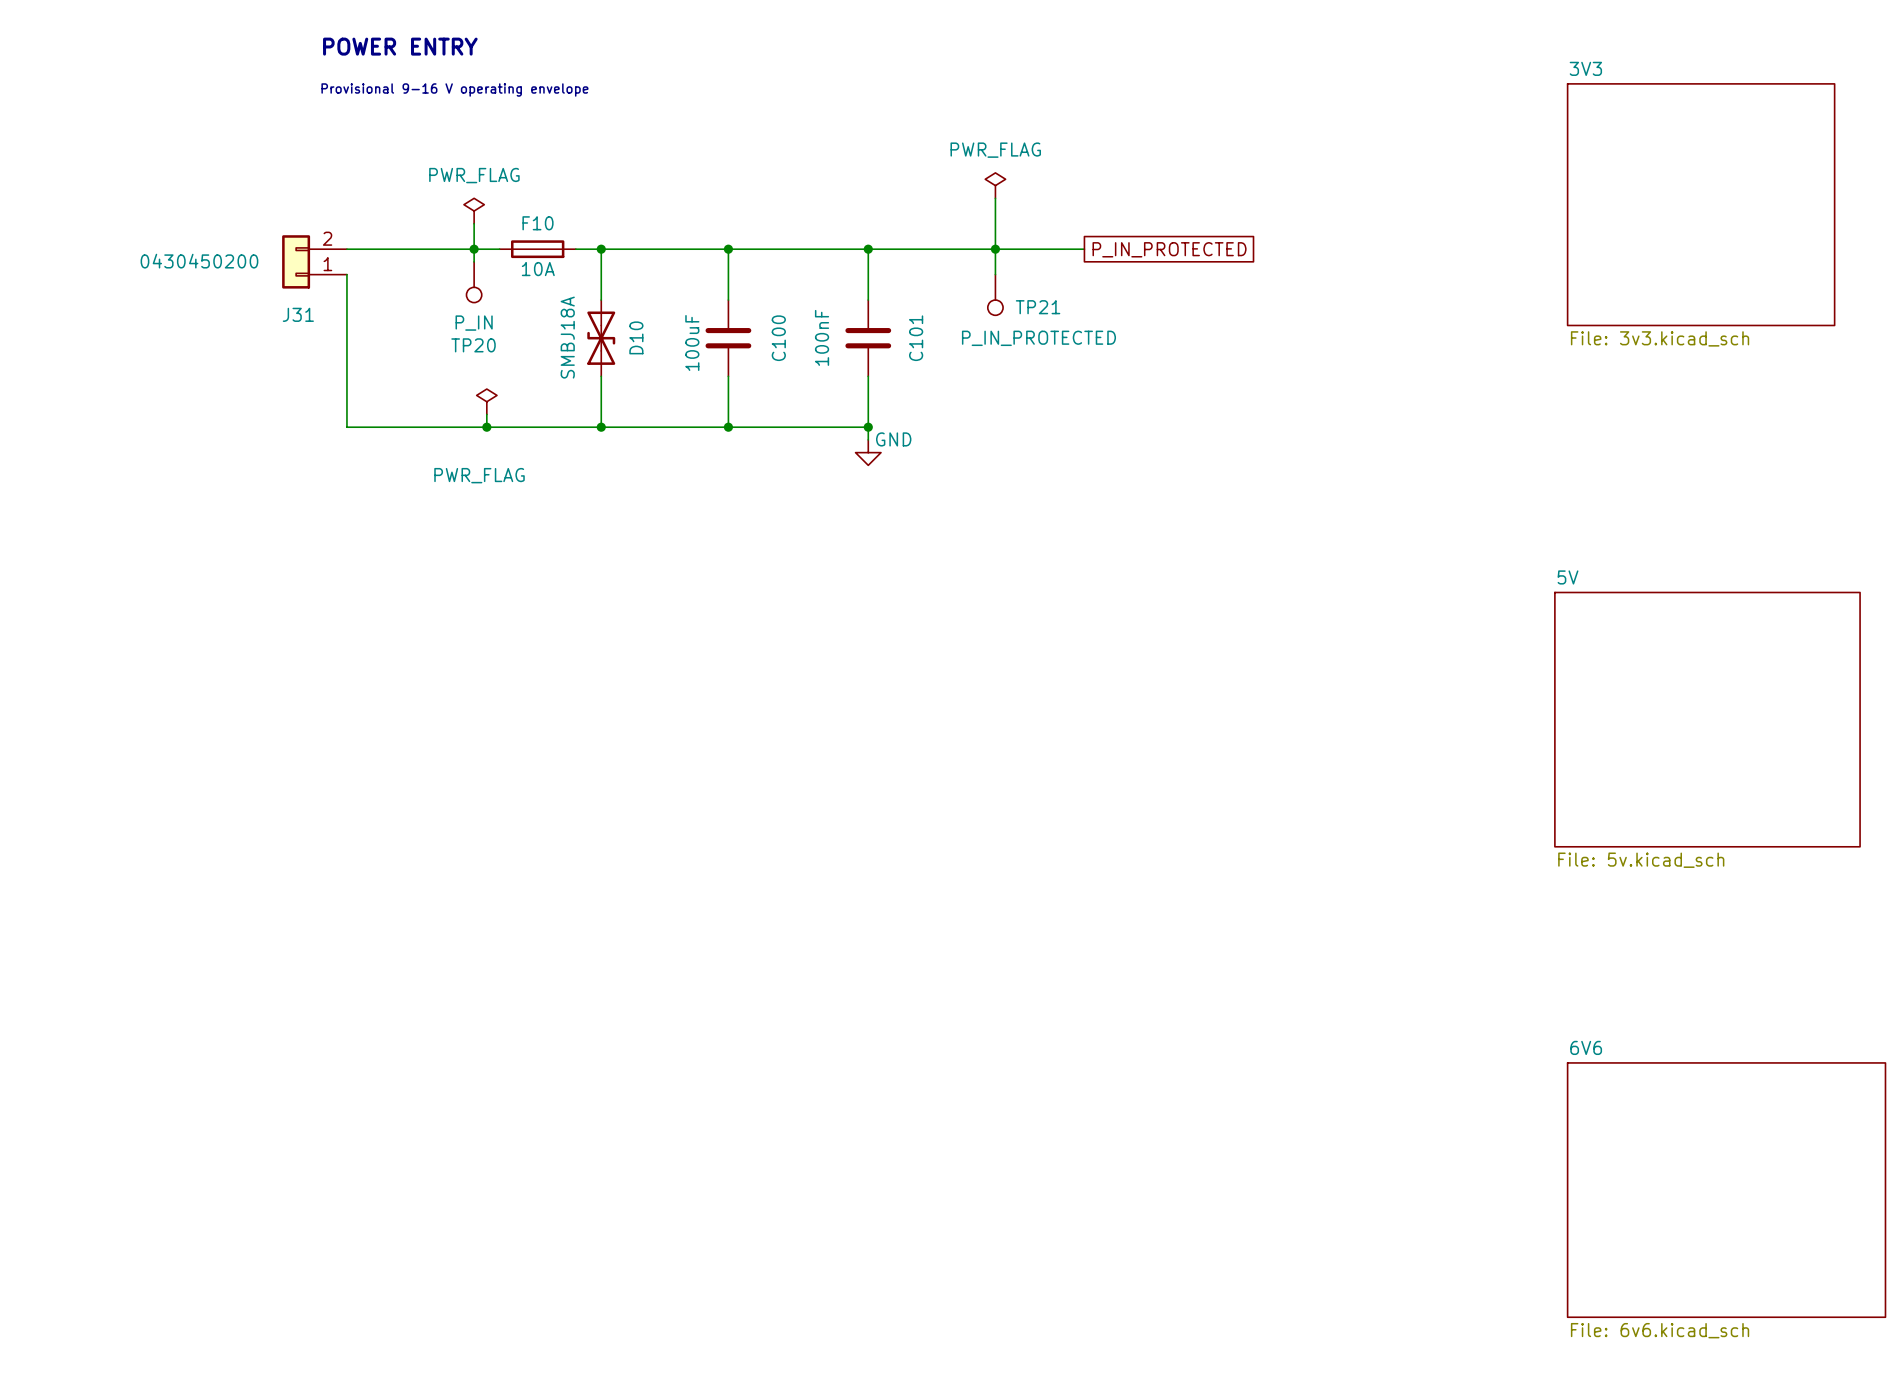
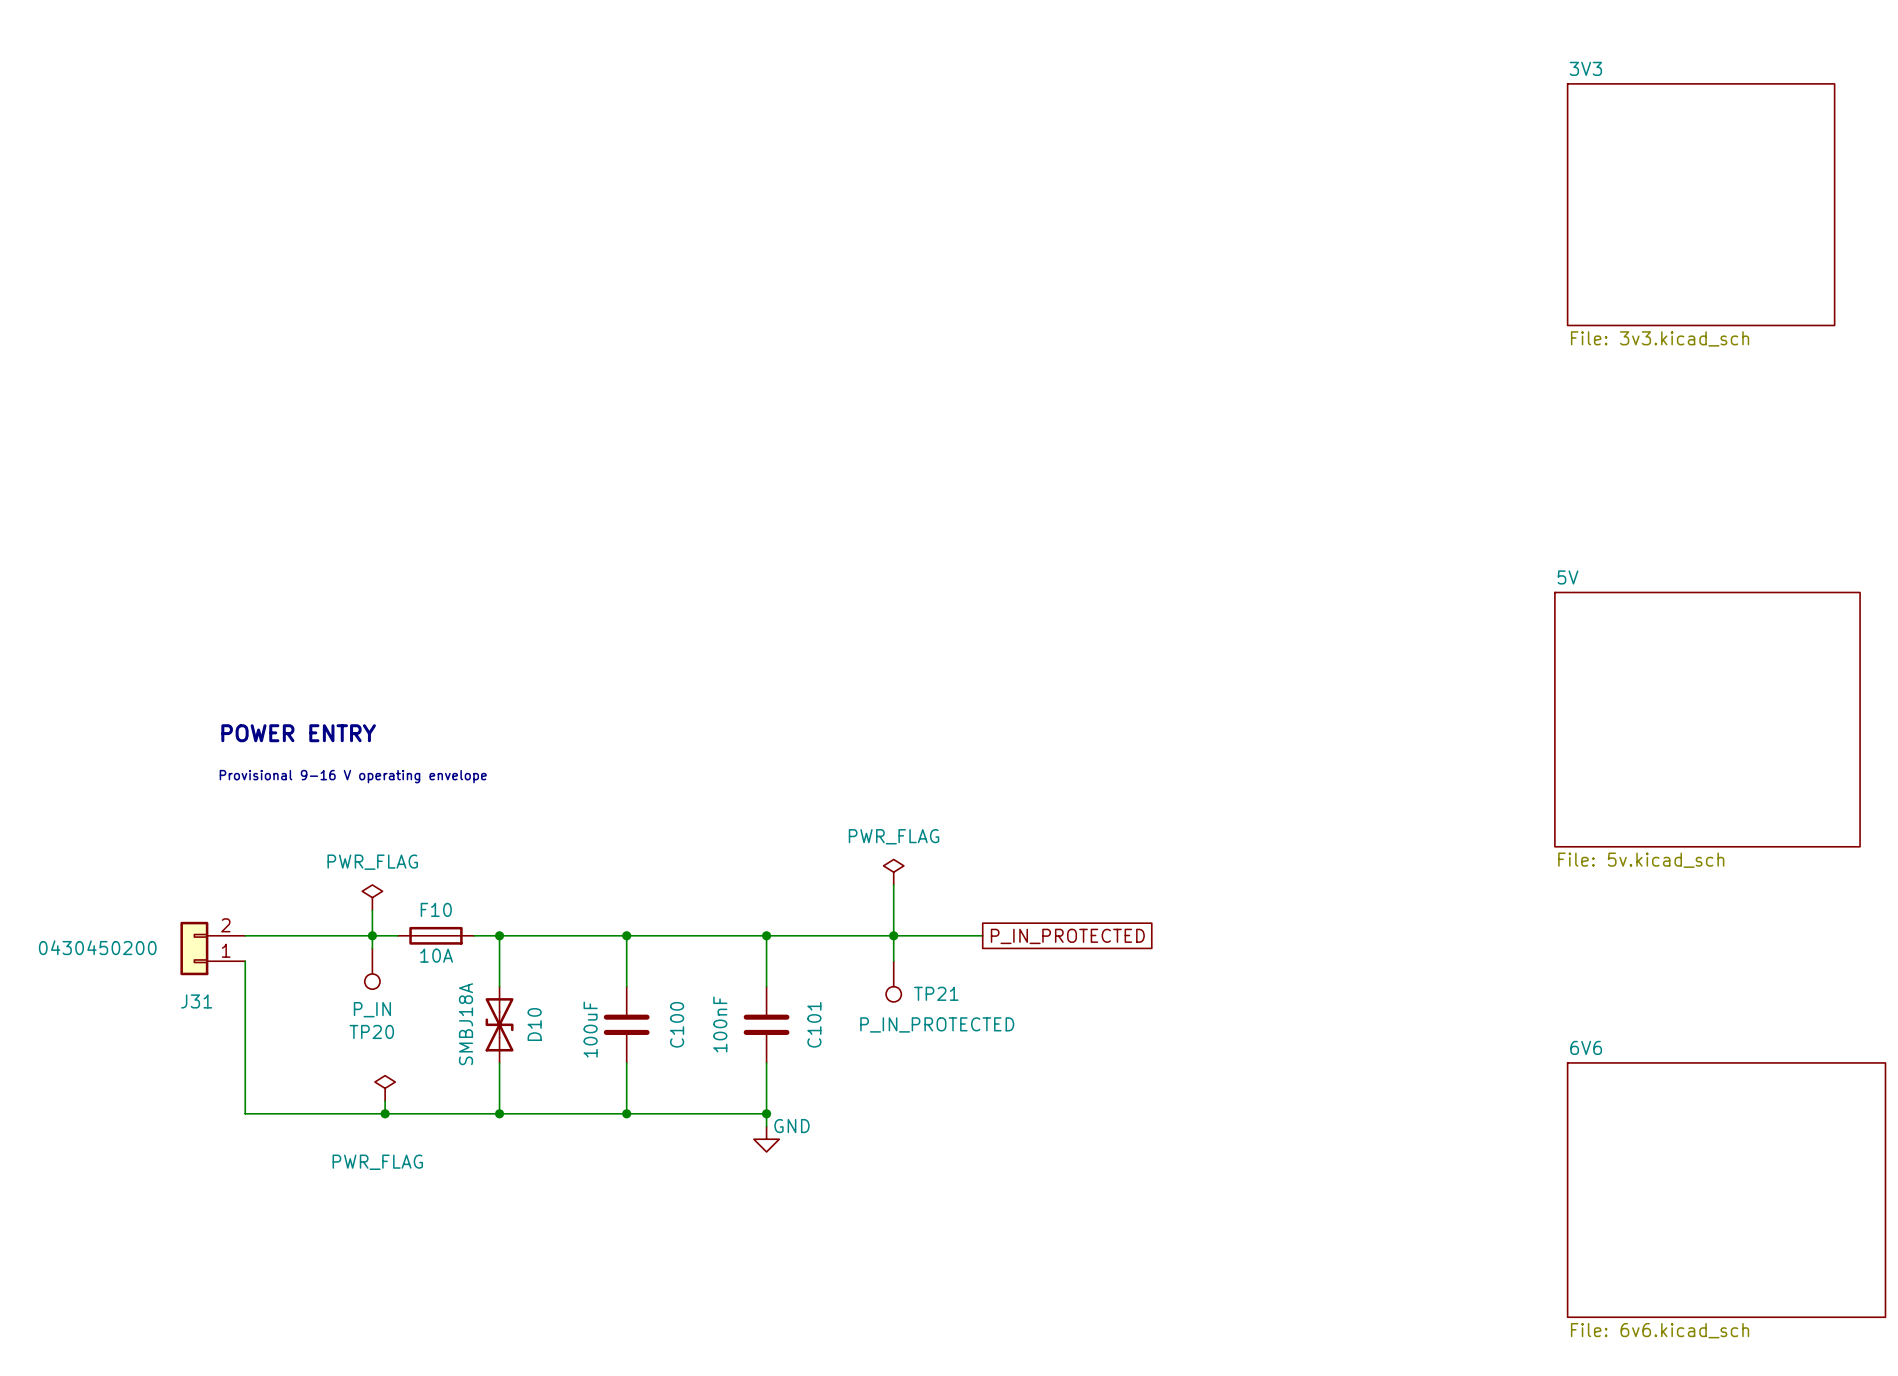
text: POWER ENTRY (400, 46) -> none
text: Provisional 9-16 V operating envelope (454, 90) -> none
power symbol: PWR_FLAG (995, 185) -> none
wire: (995, 198) (995, 274) -> none
power symbol: PWR_FLAG (474, 211) -> none
wire: (474, 223) (474, 261) -> none
wire: (346, 249) (499, 249) -> none
junction: (474, 249) -> none
F10 position: (537, 249) -> (435, 935)
wire: (575, 249) (1084, 249) -> none
wire: (601, 249) (601, 300) -> none
junction: (601, 249) -> none
wire: (728, 249) (728, 300) -> none
junction: (728, 249) -> none
wire: (868, 249) (868, 300) -> none
junction: (868, 249) -> none
junction: (995, 249) -> none
global label: P_IN_PROTECTED (1169, 249) -> none
J31 position: (314, 261) -> (212, 948)
wire: (346, 274) (346, 427) (868, 427) -> none
TP20 position: (474, 282) -> (372, 968)
TP21 position: (995, 294) -> (893, 981)
D10 position: (601, 338) -> (499, 1024)
C100 position: (728, 338) -> (626, 1024)
C101 position: (868, 338) -> (766, 1024)
wire: (601, 376) (601, 427) -> none
wire: (728, 376) (728, 427) -> none
wire: (868, 376) (868, 439) -> none
power symbol: PWR_FLAG (486, 401) -> none
wire: (486, 414) (486, 427) -> none
junction: (486, 427) -> none
junction: (601, 427) -> none
junction: (728, 427) -> none
junction: (868, 427) -> none
power symbol: GND (868, 452) -> none
text: none -> POWER ENTRY (298, 733)
text: none -> Provisional 9-16 V operating envelope (353, 776)
power symbol: none -> PWR_FLAG (893, 872)
wire: none -> (893, 884) (893, 961)
power symbol: none -> PWR_FLAG (372, 897)
wire: none -> (372, 910) (372, 948)
wire: none -> (245, 935) (397, 935)
junction: none -> (372, 935)
wire: none -> (474, 935) (982, 935)
wire: none -> (499, 935) (499, 986)
junction: none -> (499, 935)
wire: none -> (626, 935) (626, 986)
junction: none -> (626, 935)
wire: none -> (766, 935) (766, 986)
junction: none -> (766, 935)
junction: none -> (893, 935)
global label: none -> P_IN_PROTECTED (1067, 936)
wire: none -> (245, 961) (245, 1113) (766, 1113)
wire: none -> (499, 1062) (499, 1113)
wire: none -> (626, 1062) (626, 1113)
wire: none -> (766, 1062) (766, 1126)
power symbol: none -> PWR_FLAG (385, 1088)
wire: none -> (385, 1101) (385, 1113)
junction: none -> (385, 1113)
junction: none -> (499, 1113)
junction: none -> (626, 1113)
junction: none -> (766, 1113)
power symbol: none -> GND (766, 1139)

